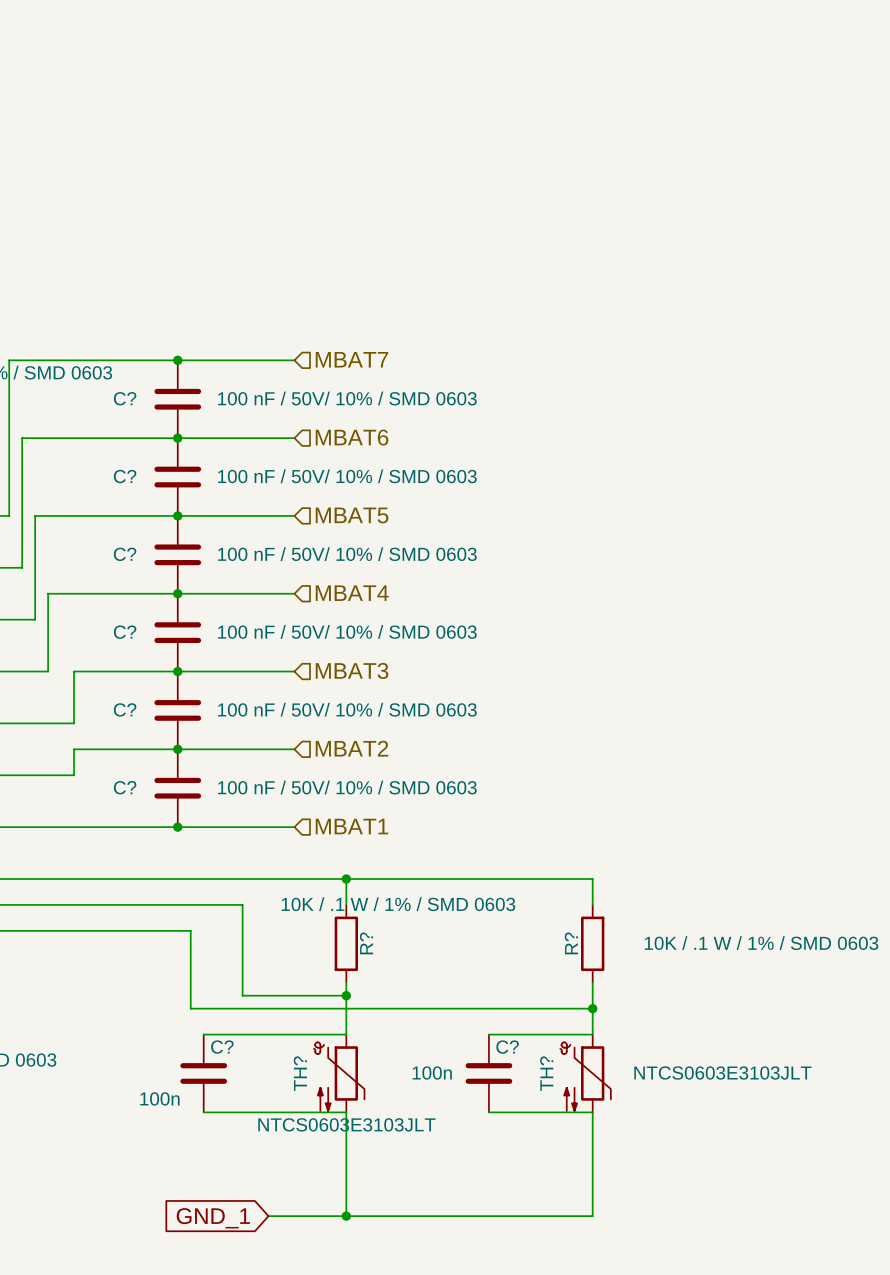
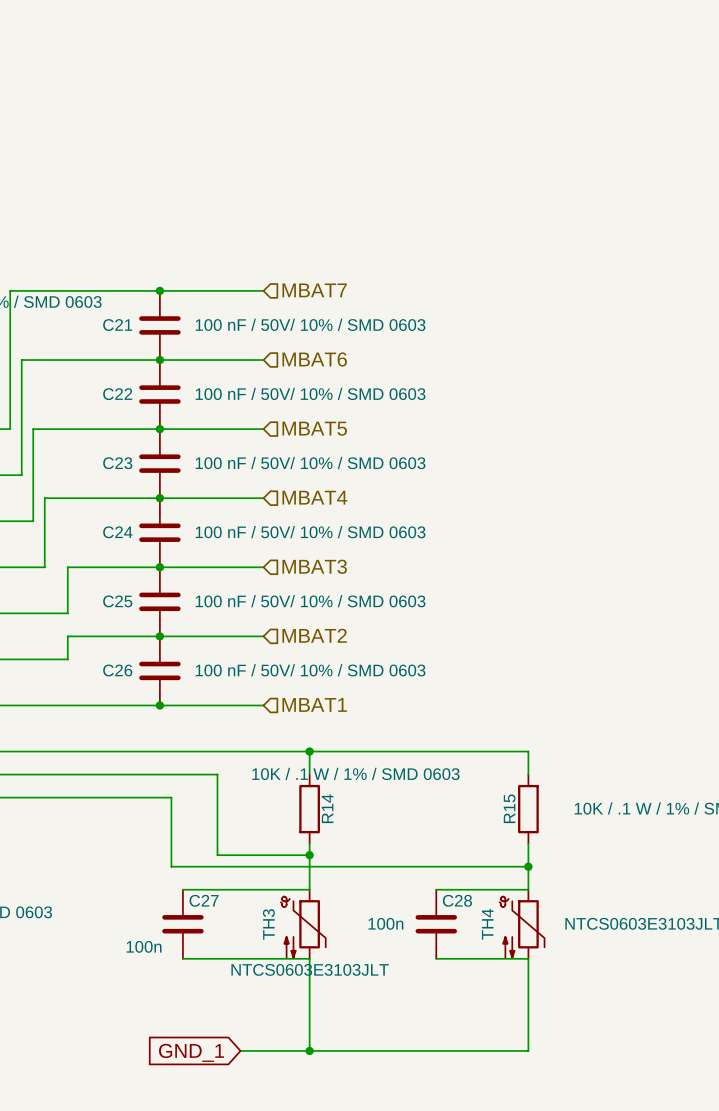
C? name: C? (125, 398) -> C21 (117, 325)
C? name: C? (125, 476) -> C22 (117, 394)
C? name: C? (125, 554) -> C23 (117, 463)
C? name: C? (125, 632) -> C24 (117, 532)
C? name: C? (125, 709) -> C25 (117, 601)
C? name: C? (125, 787) -> C26 (117, 670)
R? name: R? (366, 943) -> R14 (327, 808)
R? name: R? (571, 943) -> R15 (509, 808)
C? name: C? (222, 1047) -> C27 (204, 900)
C? name: C? (507, 1047) -> C28 (457, 900)
TH? name: TH? (300, 1073) -> TH3 (268, 924)
TH? name: TH? (546, 1073) -> TH4 (487, 924)

